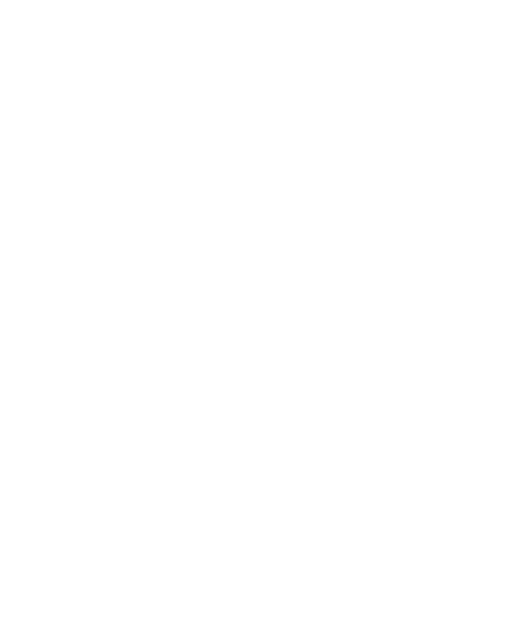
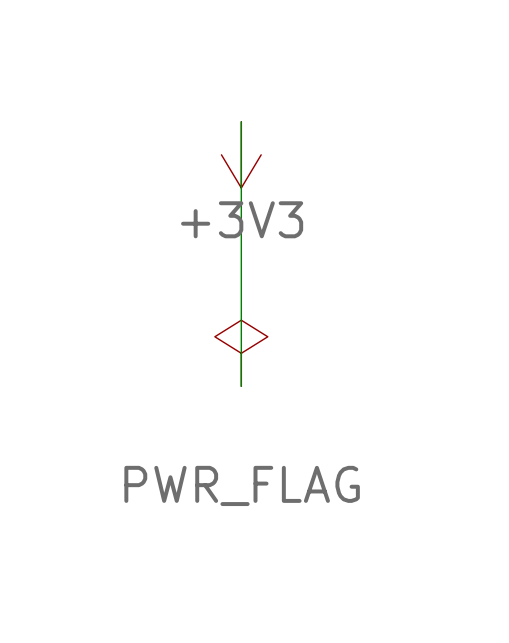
wire: none -> (241, 121) (241, 386)
power symbol: none -> +3V3 (241, 154)
power symbol: none -> PWR_FLAG (241, 353)

